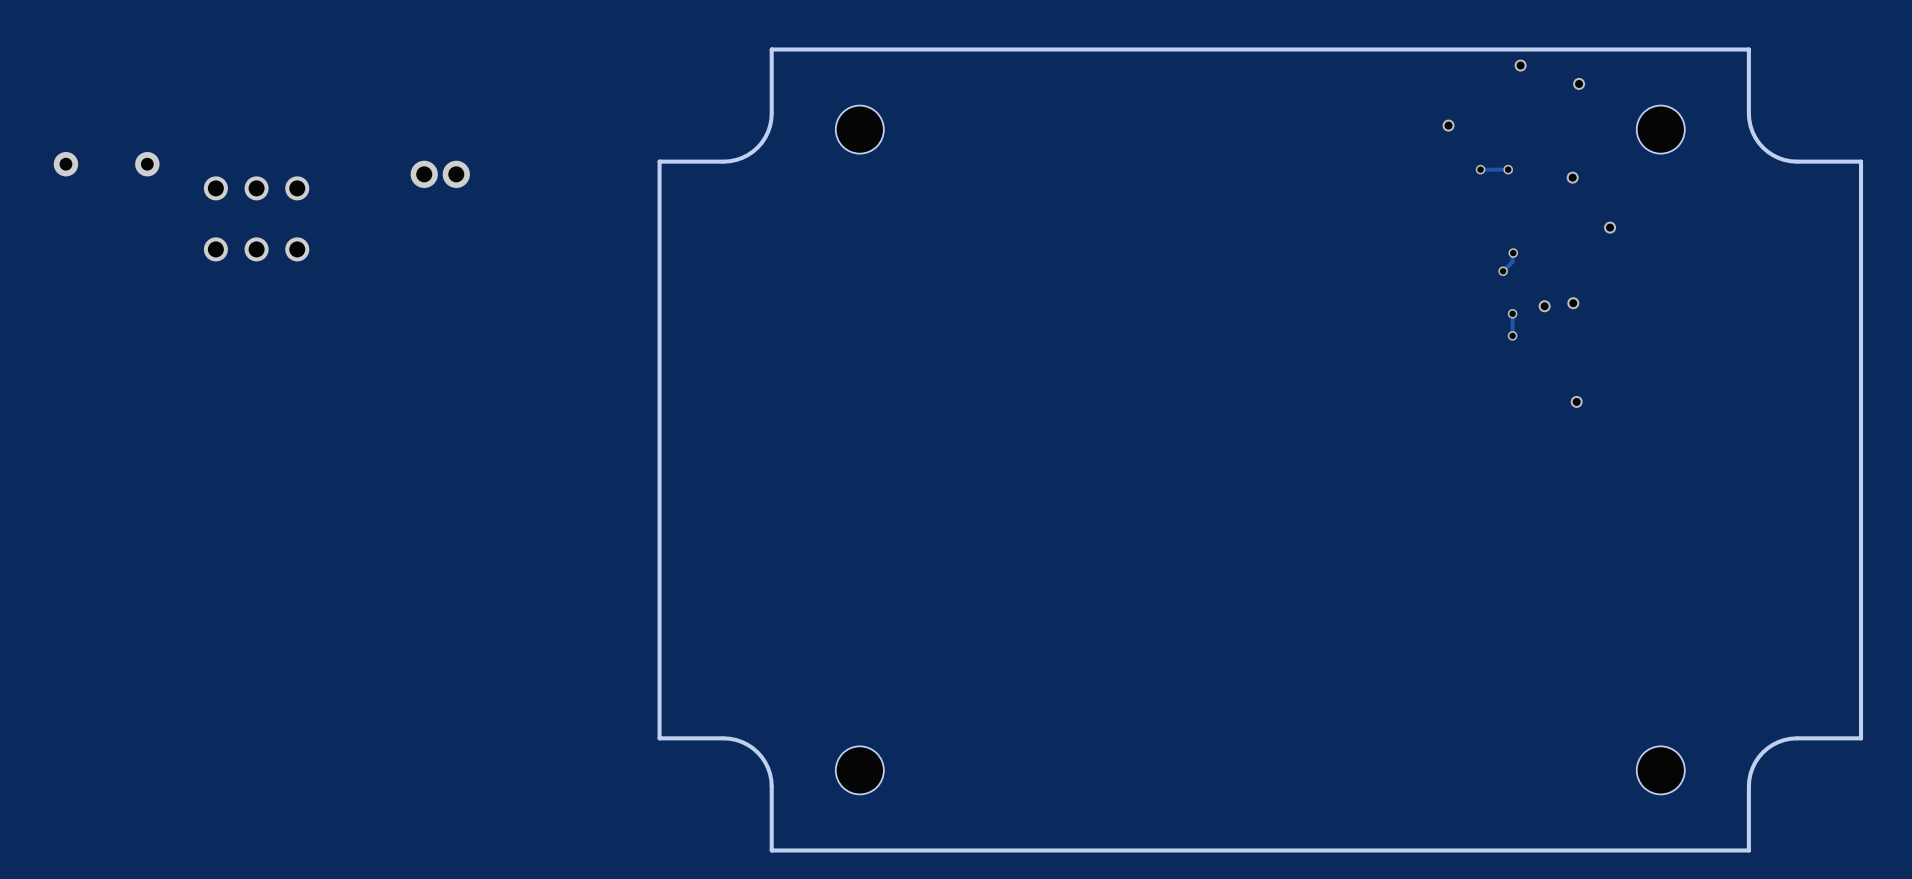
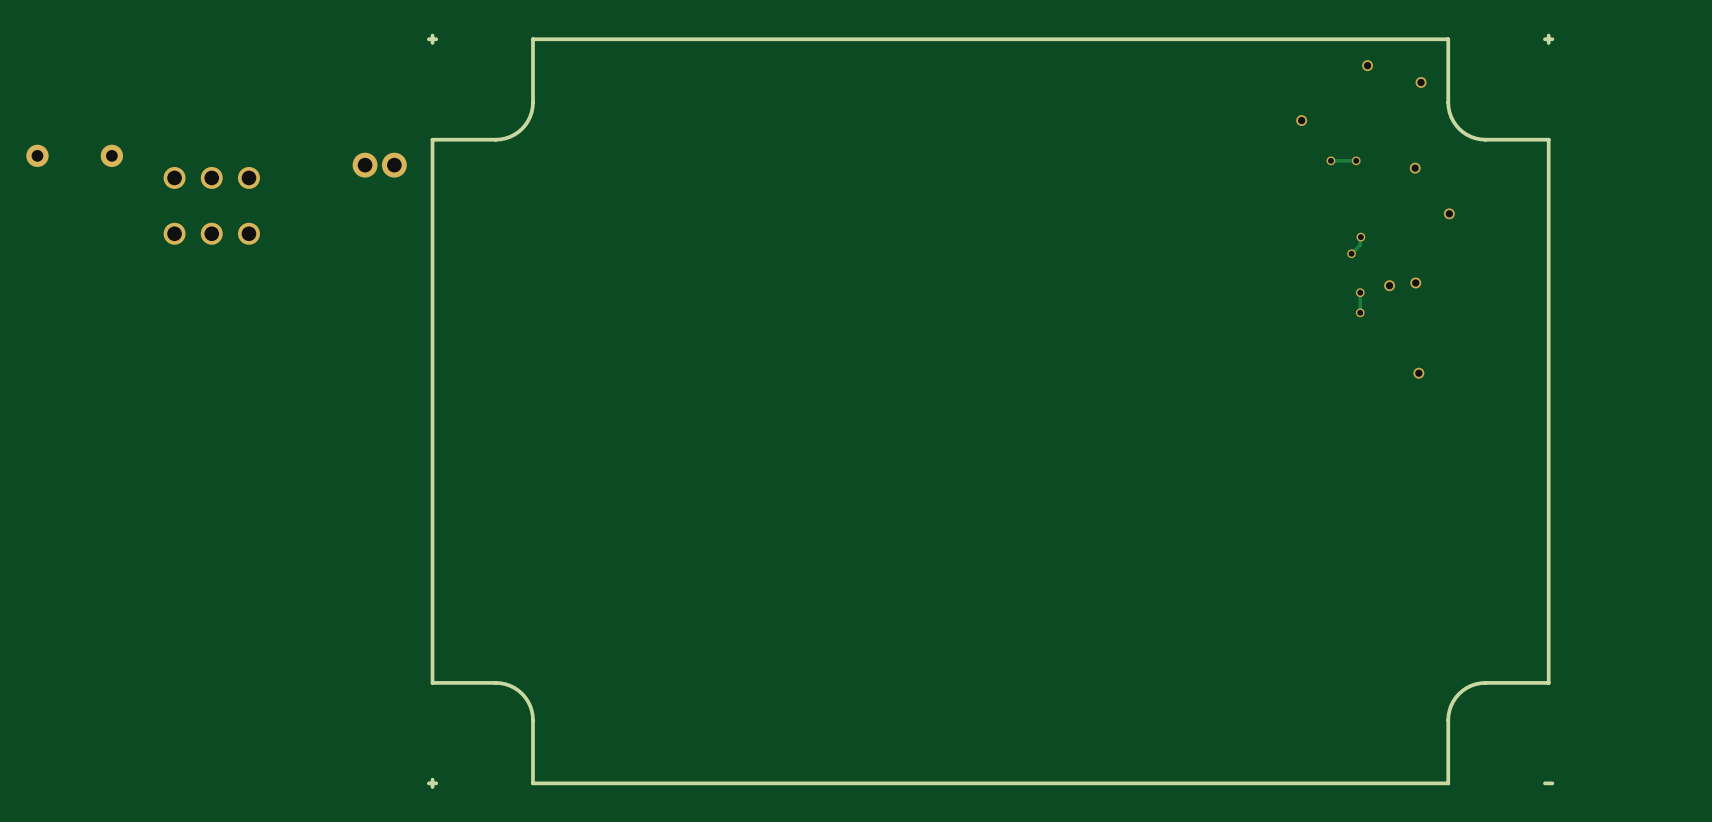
board edge: none -> (432, 35) (432, 42)
board edge: none -> (1548, 35) (1548, 42)
board edge: none -> (436, 39) (428, 39)
board edge: none -> (1552, 39) (1544, 39)
part: (859, 129) -> none
part: (1660, 129) -> none
part: (859, 770) -> none
part: (1660, 770) -> none
board edge: none -> (432, 779) (432, 787)
board edge: none -> (436, 783) (428, 783)
board edge: (1714, 850) (1608, 850) -> none
board edge: (1722, 850) (1748, 850) (1749, 780) (1755, 762) (1767, 748) (1778, 741) (1790, 738) (1861, 738) (1861, 161) (1790, 161) (1772, 155) (1762, 147) (1755, 137) (1749, 119) (1748, 49) (771, 49) (771, 119) (765, 137) (757, 147) (747, 155) (729, 161) (659, 161) (659, 738) (729, 738) (747, 744) (757, 752) (765, 762) (771, 780) (771, 850) -> (1448, 783) (1448, 715) (1453, 701) (1459, 693) (1471, 685) (1480, 683) (1548, 682) (1548, 139) (1480, 139) (1471, 136) (1459, 128) (1453, 121) (1448, 107) (1448, 39) (532, 39) (532, 107) (528, 121) (522, 128) (514, 134) (500, 139) (432, 139) (432, 682) (500, 683) (514, 687) (522, 693) (530, 705) (532, 715) (532, 783) (682, 783)

